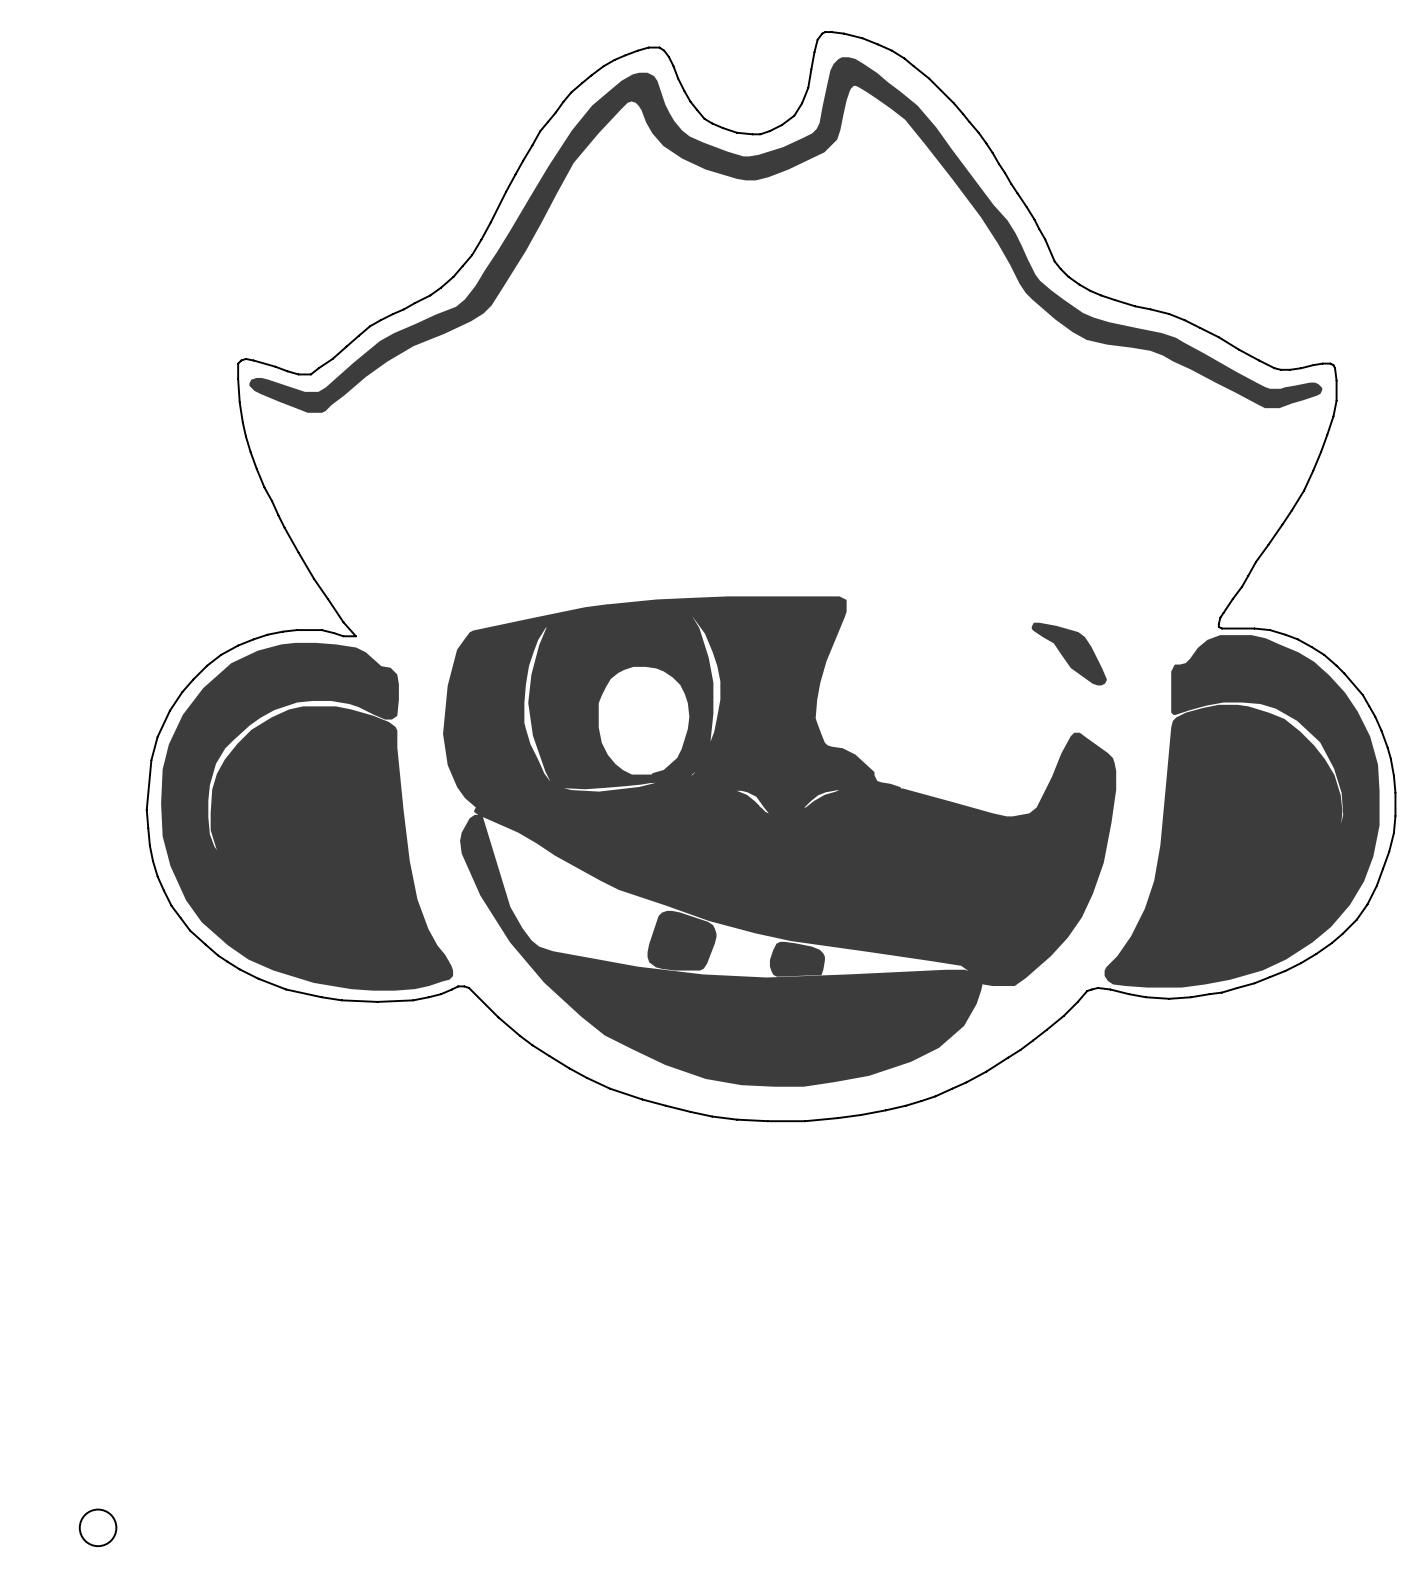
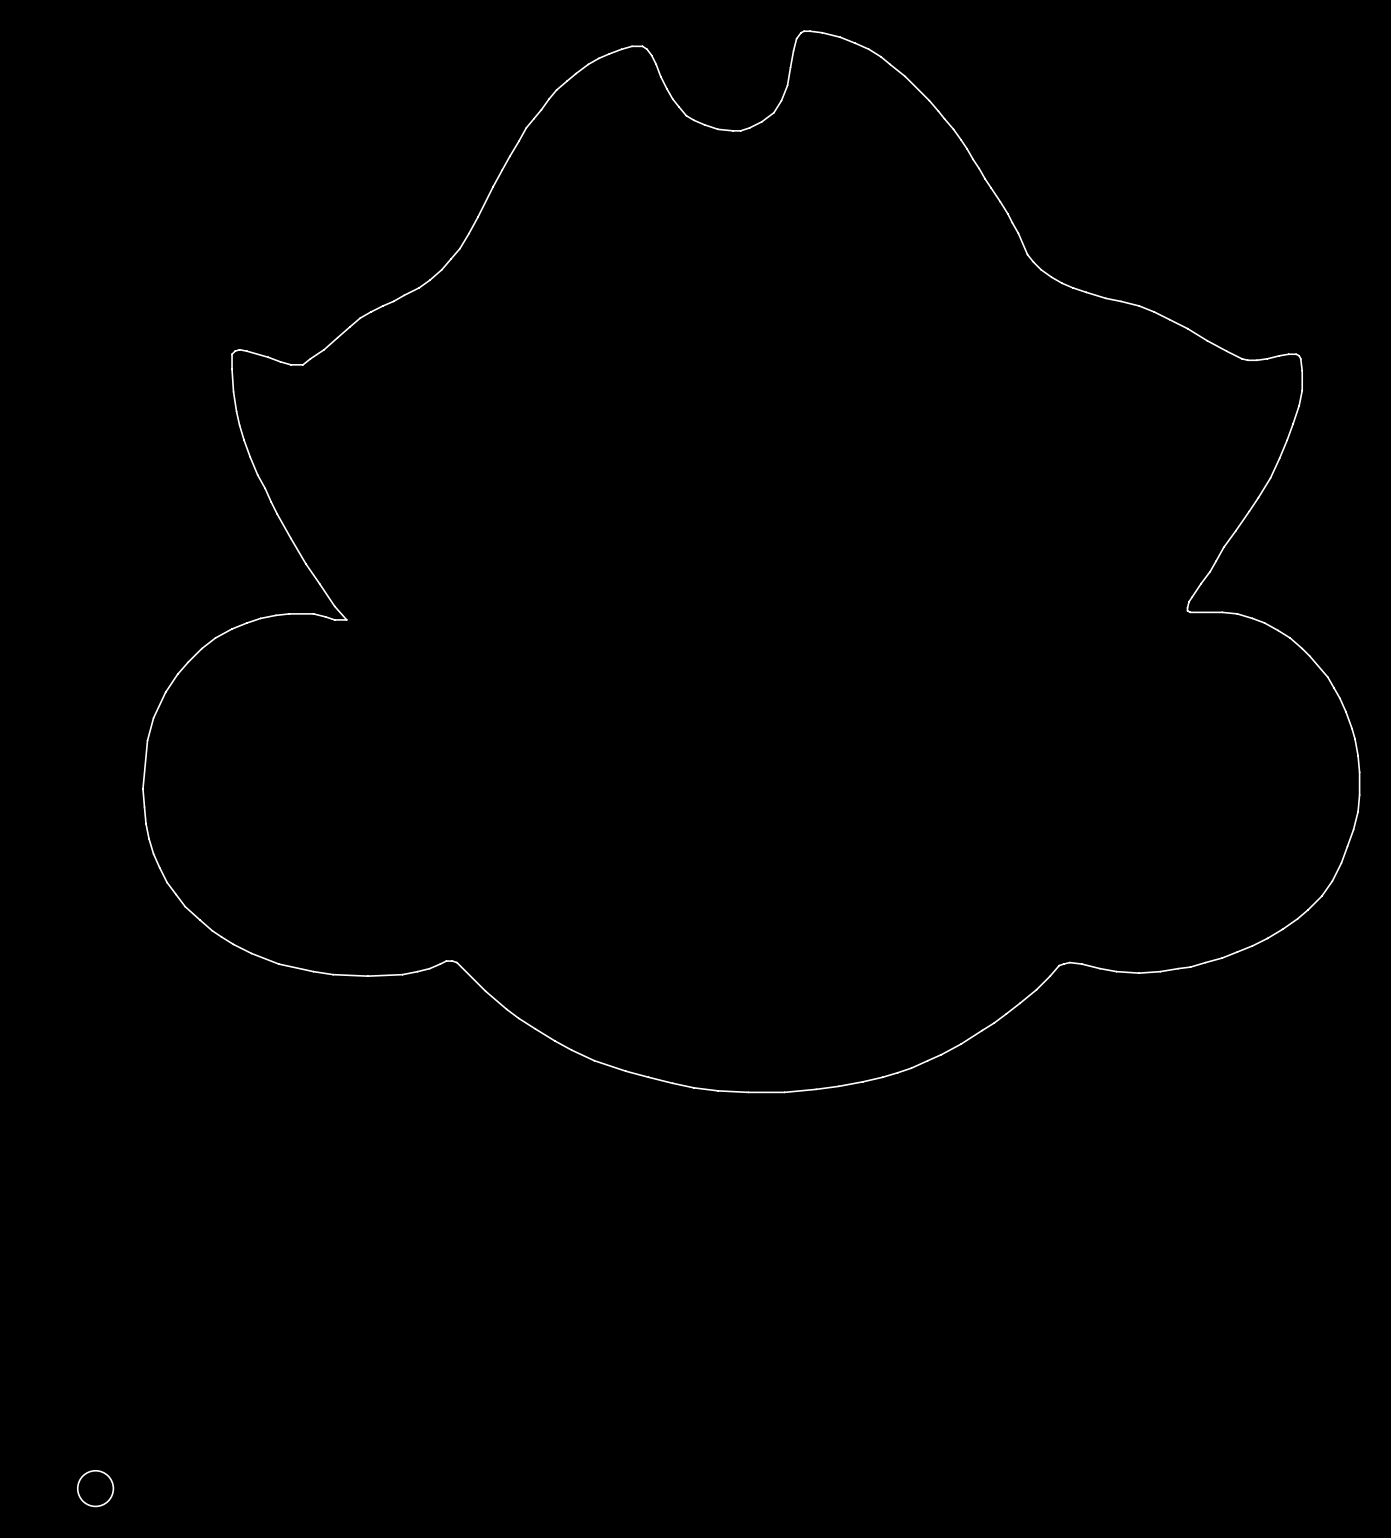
drawing: [249, 57, 1323, 413] -> none
drawing: [161, 596, 1380, 1087] -> none

